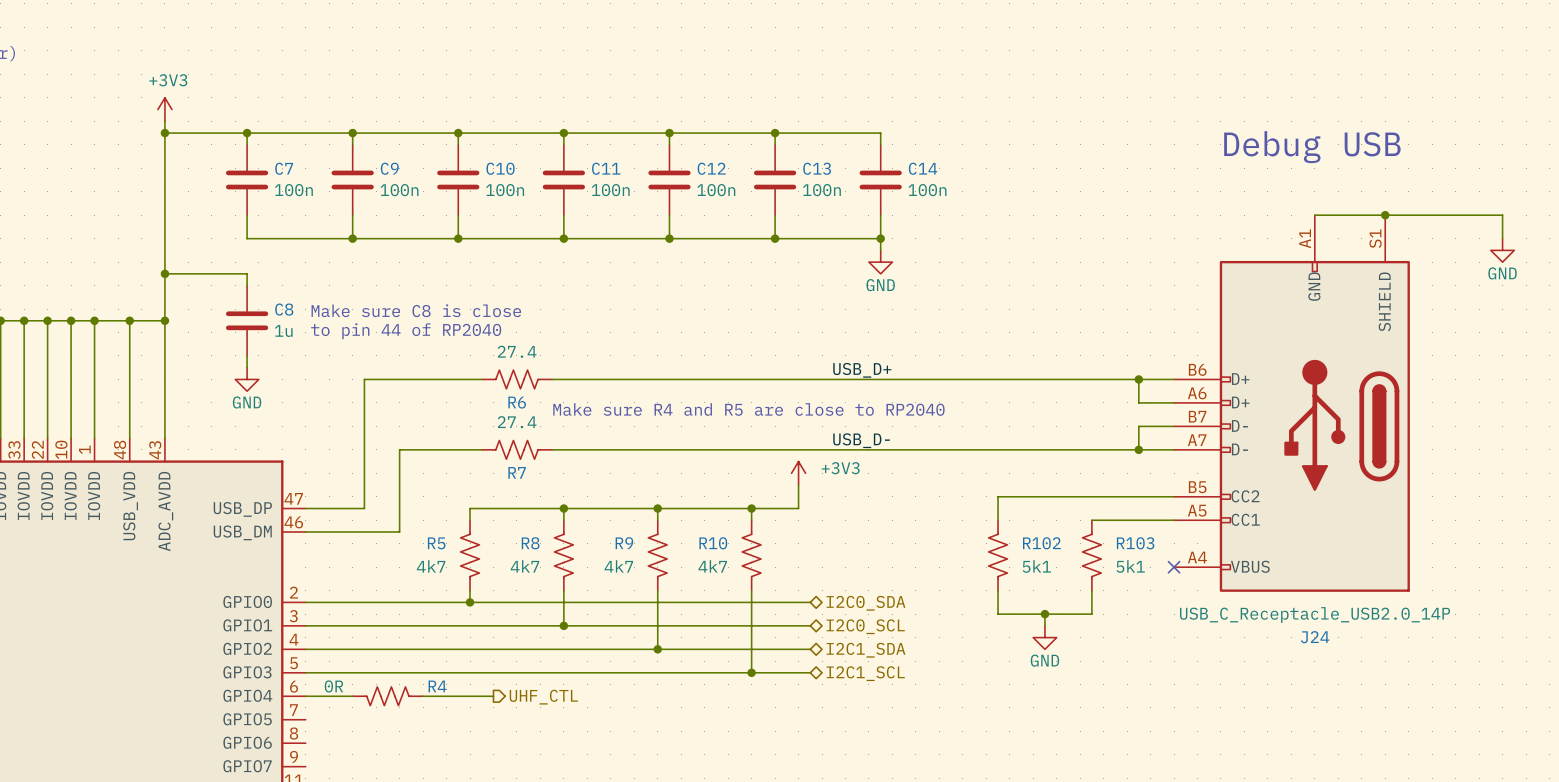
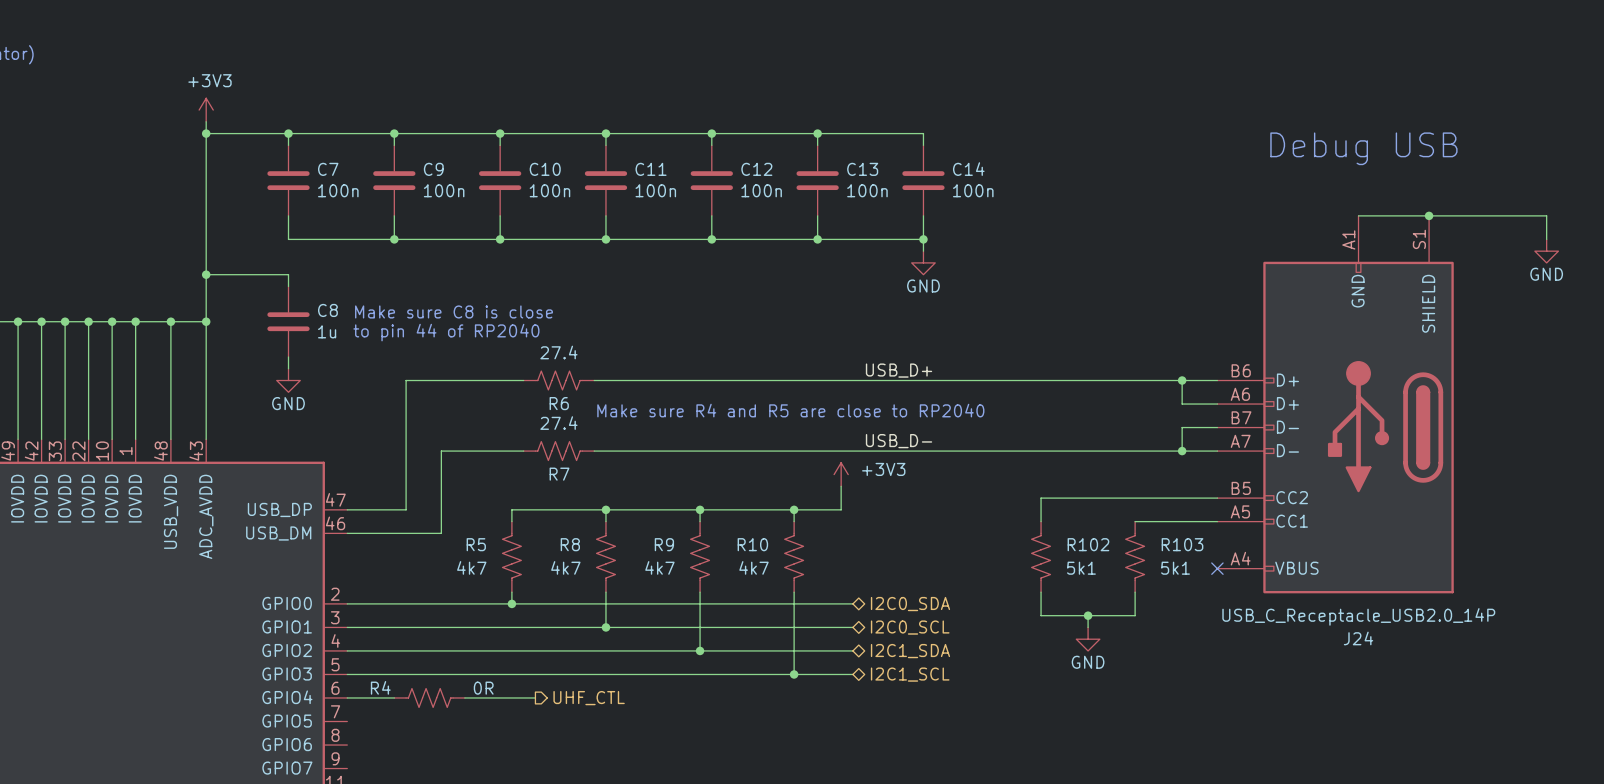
R4 flip: as is (387, 696) -> left-right (429, 697)

